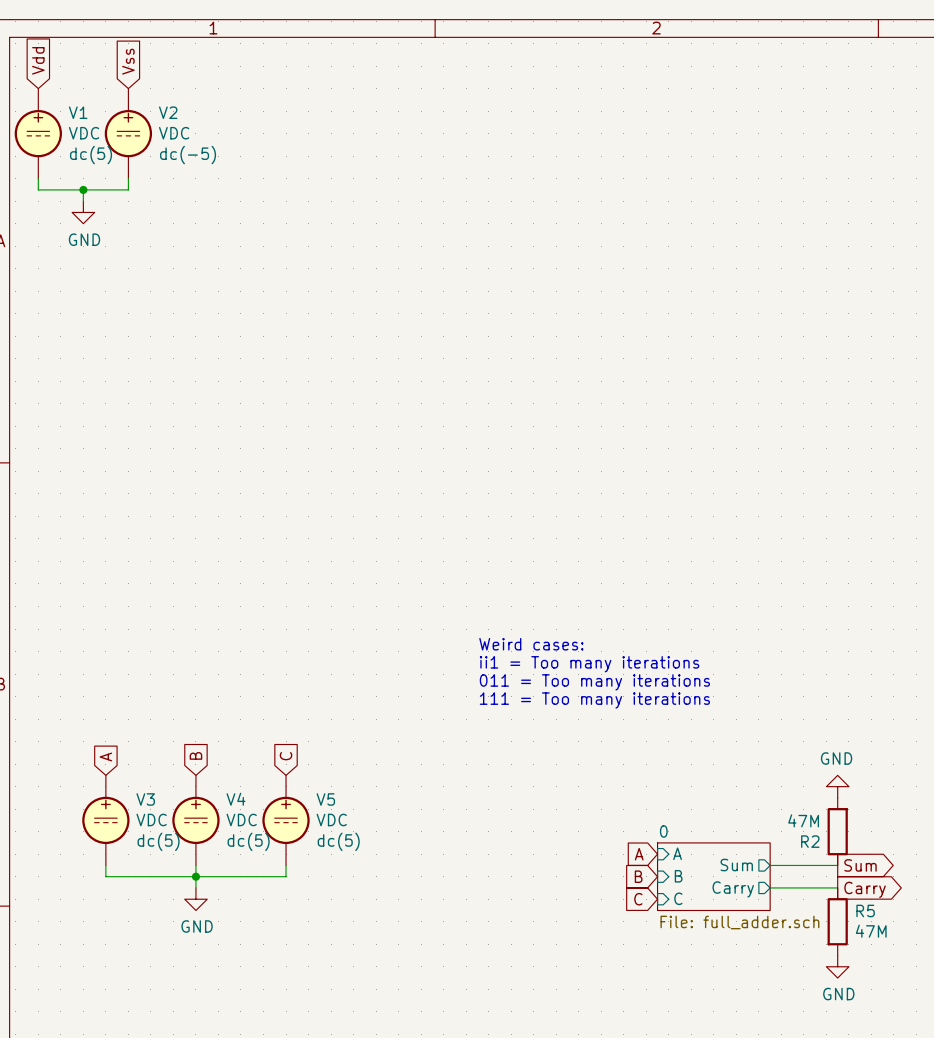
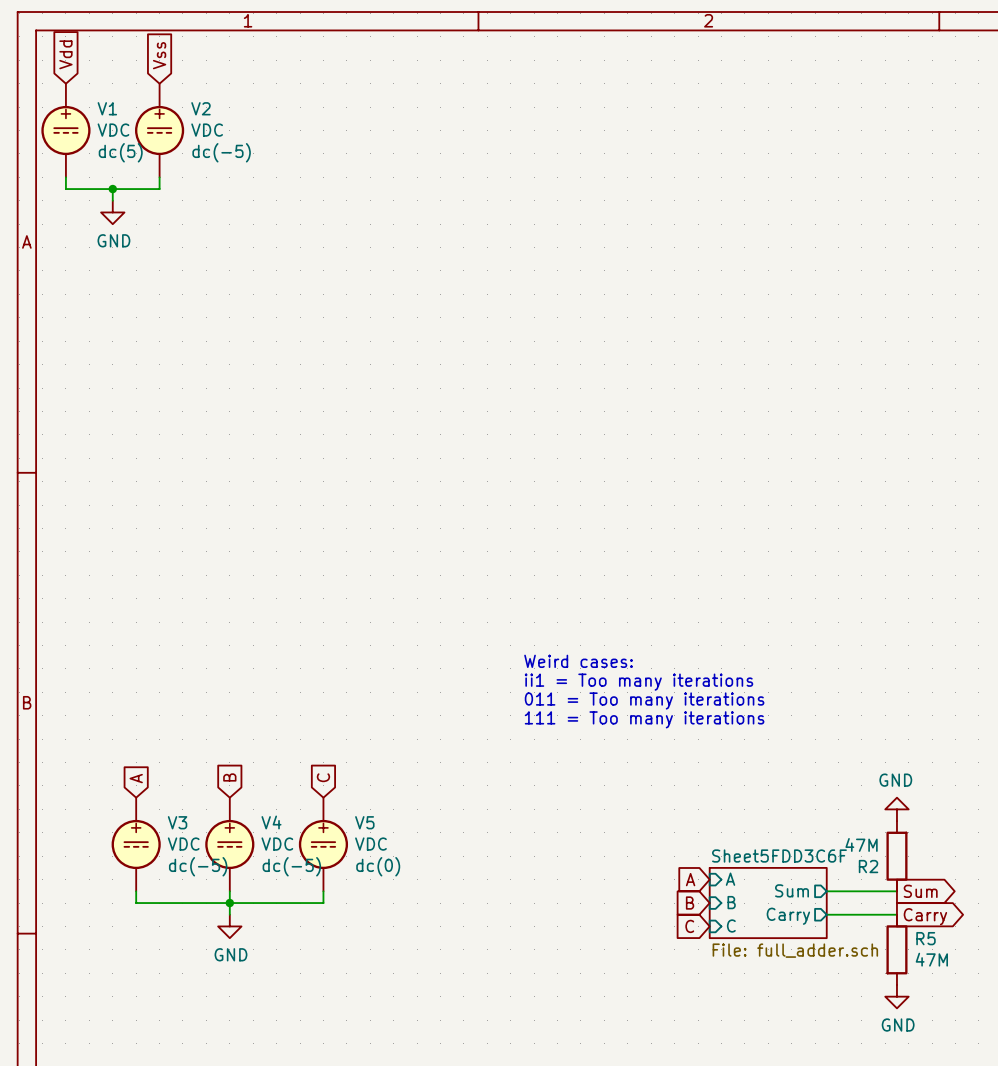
sheet 0 name: 0 (663, 831) -> Sheet5FDD3C6F (779, 856)
V3 text: dc(5) (158, 841) -> dc(-5) (198, 866)
V4 text: dc(5) (248, 841) -> dc(-5) (291, 866)
V5 text: dc(5) (338, 841) -> dc(0) (378, 866)

